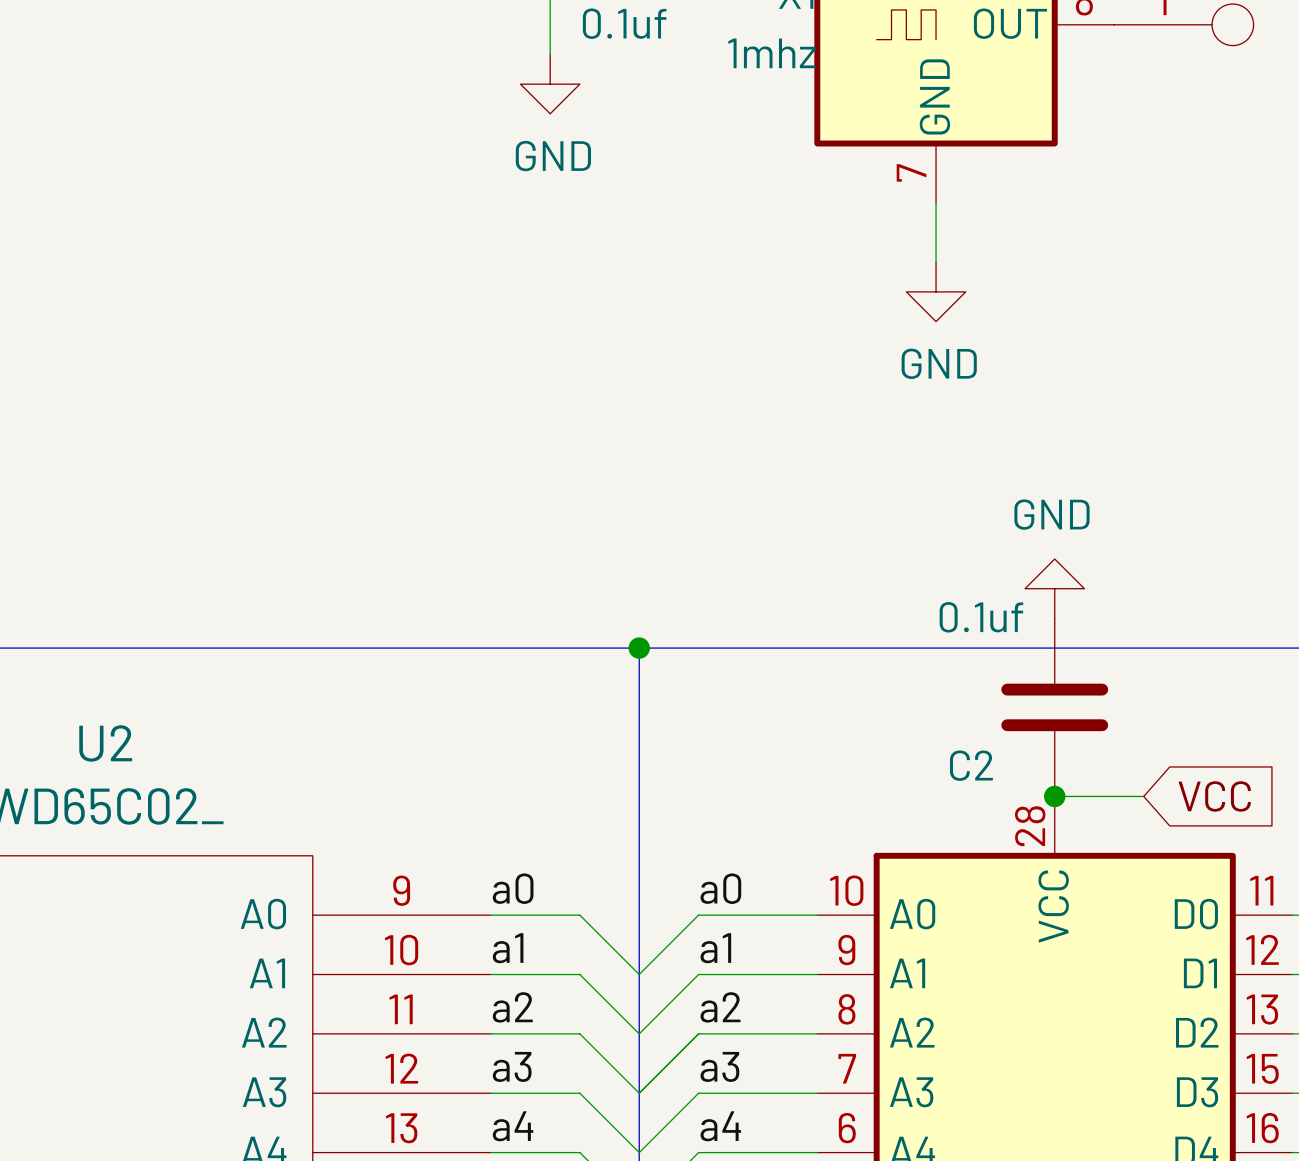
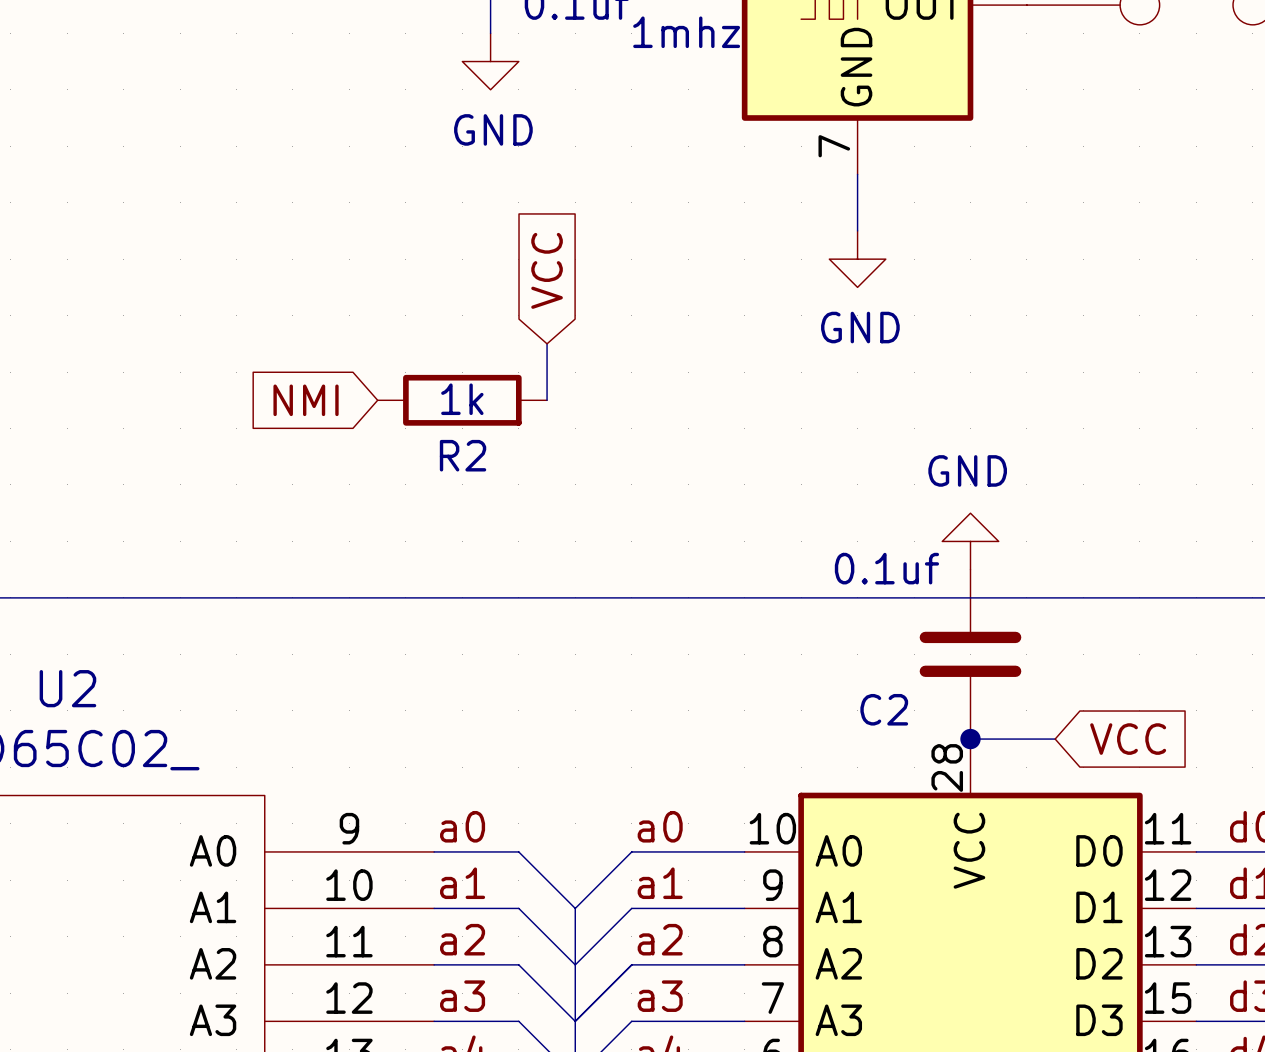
global label: none -> VCC (547, 270)
wire: none -> (547, 343) (547, 400)
global label: none -> NMI (306, 400)
R2: none -> 1k (462, 400)
bus: (639, 648) (639, 974) -> none
junction: (639, 648) -> none

